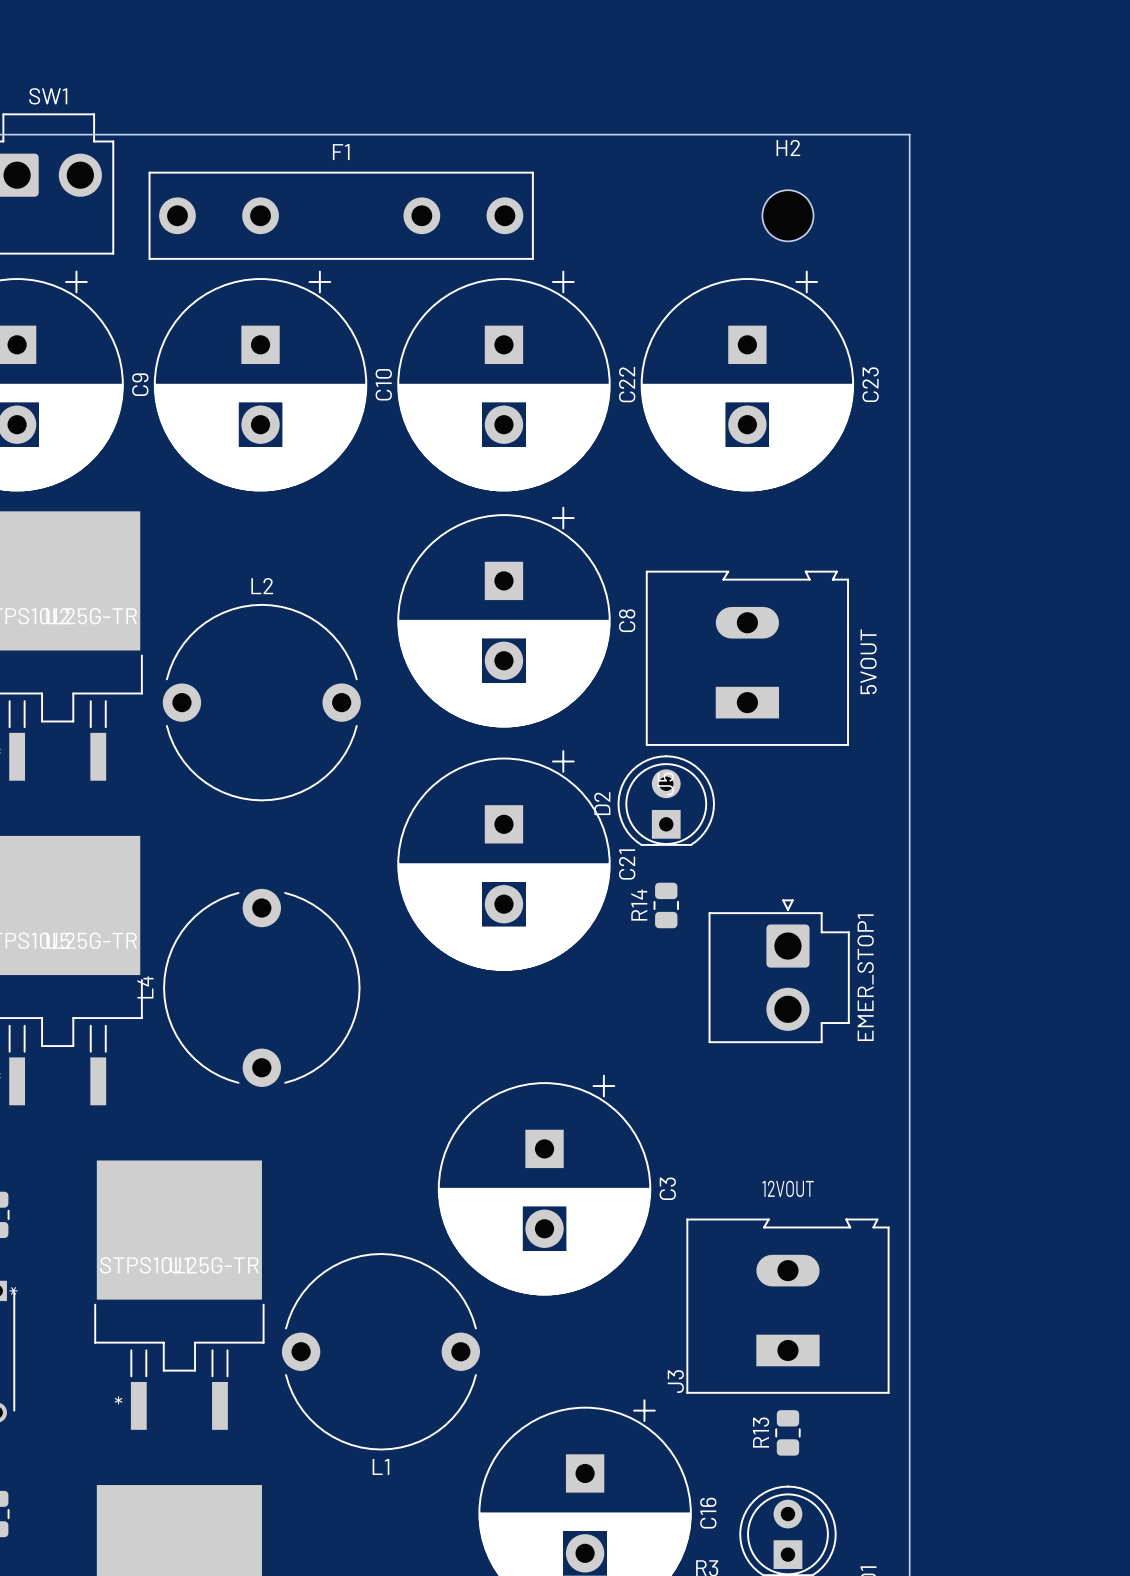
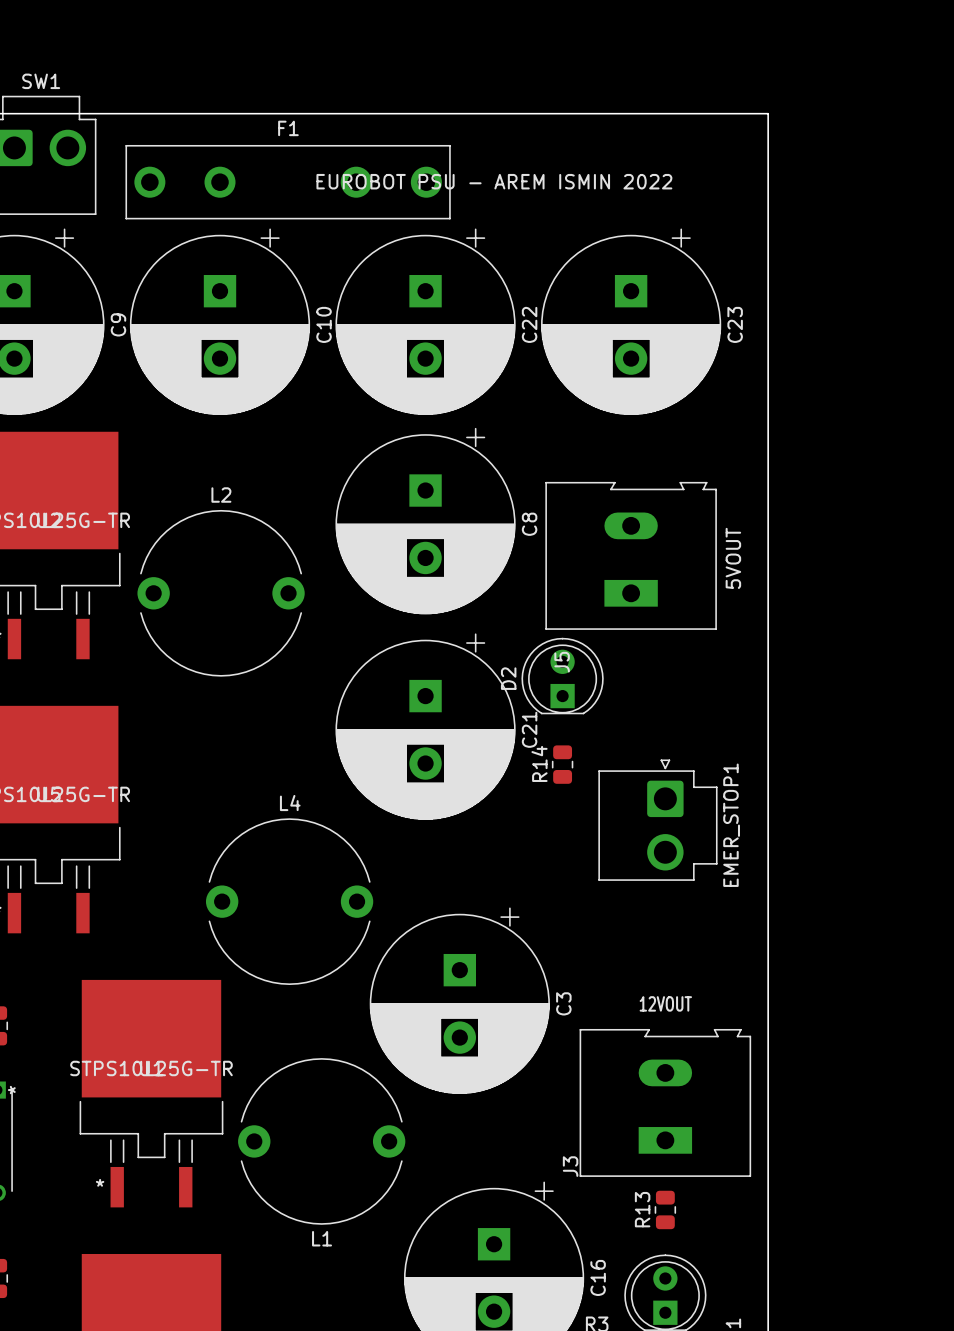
text: none -> EUROBOT PSU - AREM ISMIN 2022 (494, 181)
H2: (787, 215) -> none
L4 rotation: 0° (261, 987) -> 90° clockwise (289, 901)

